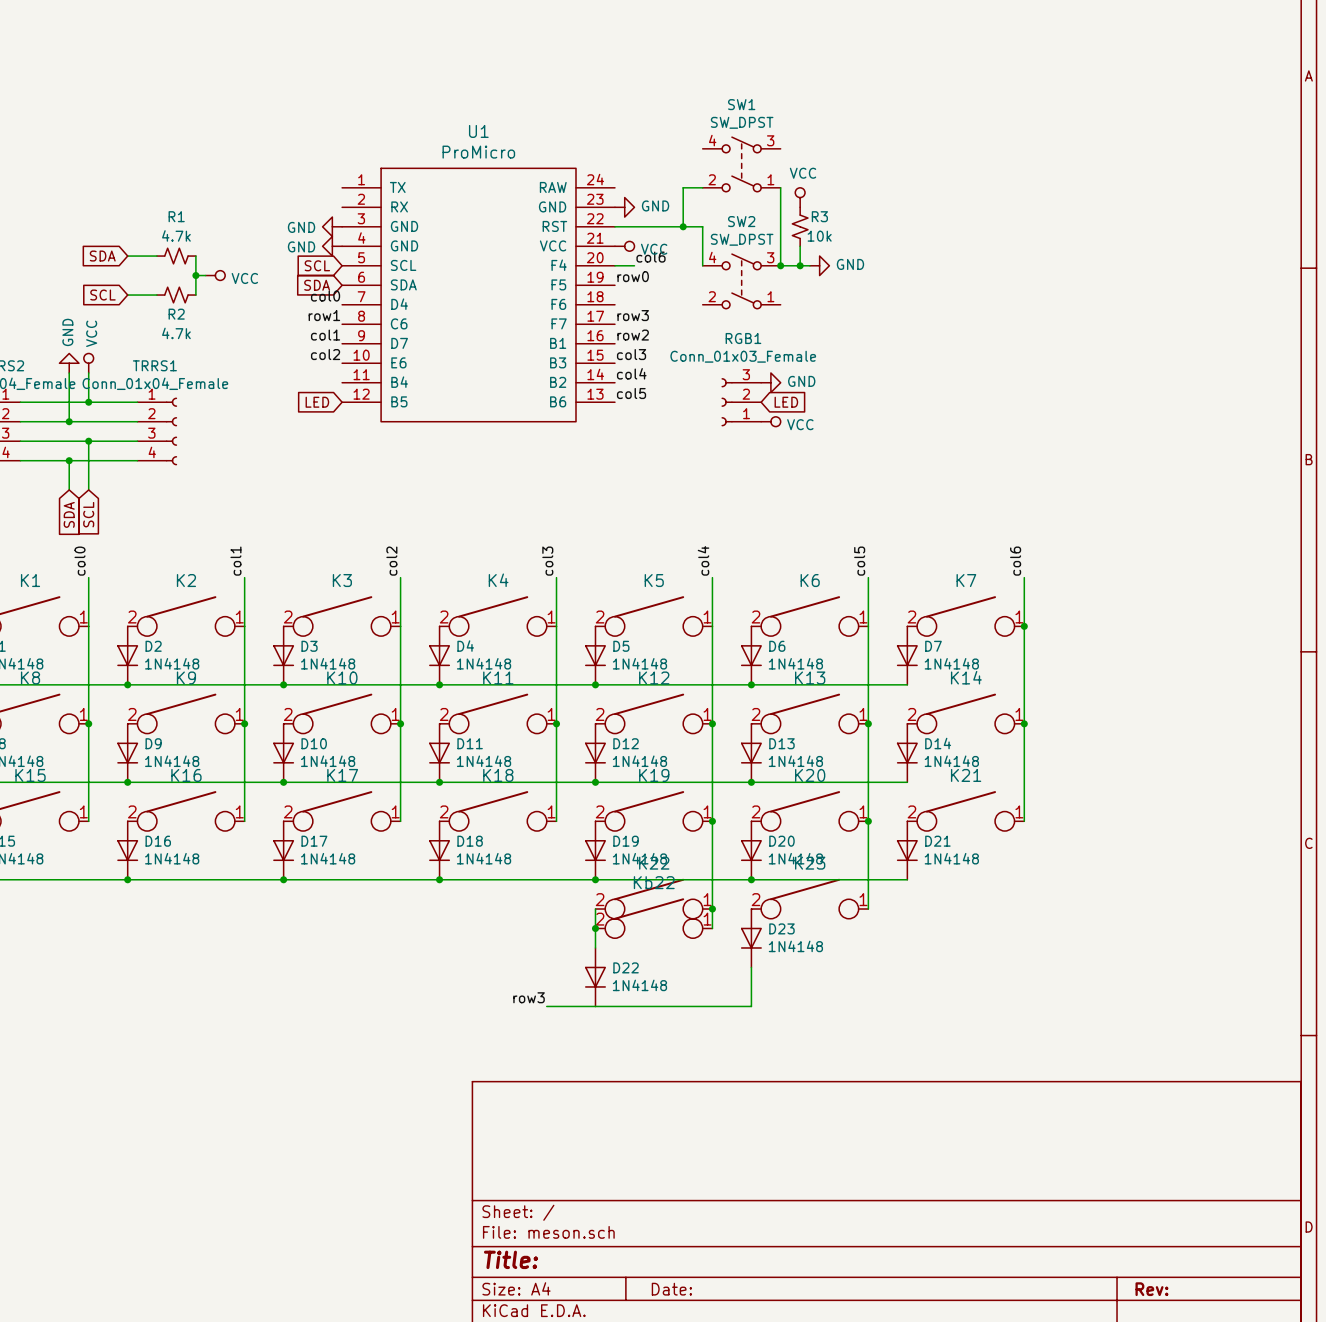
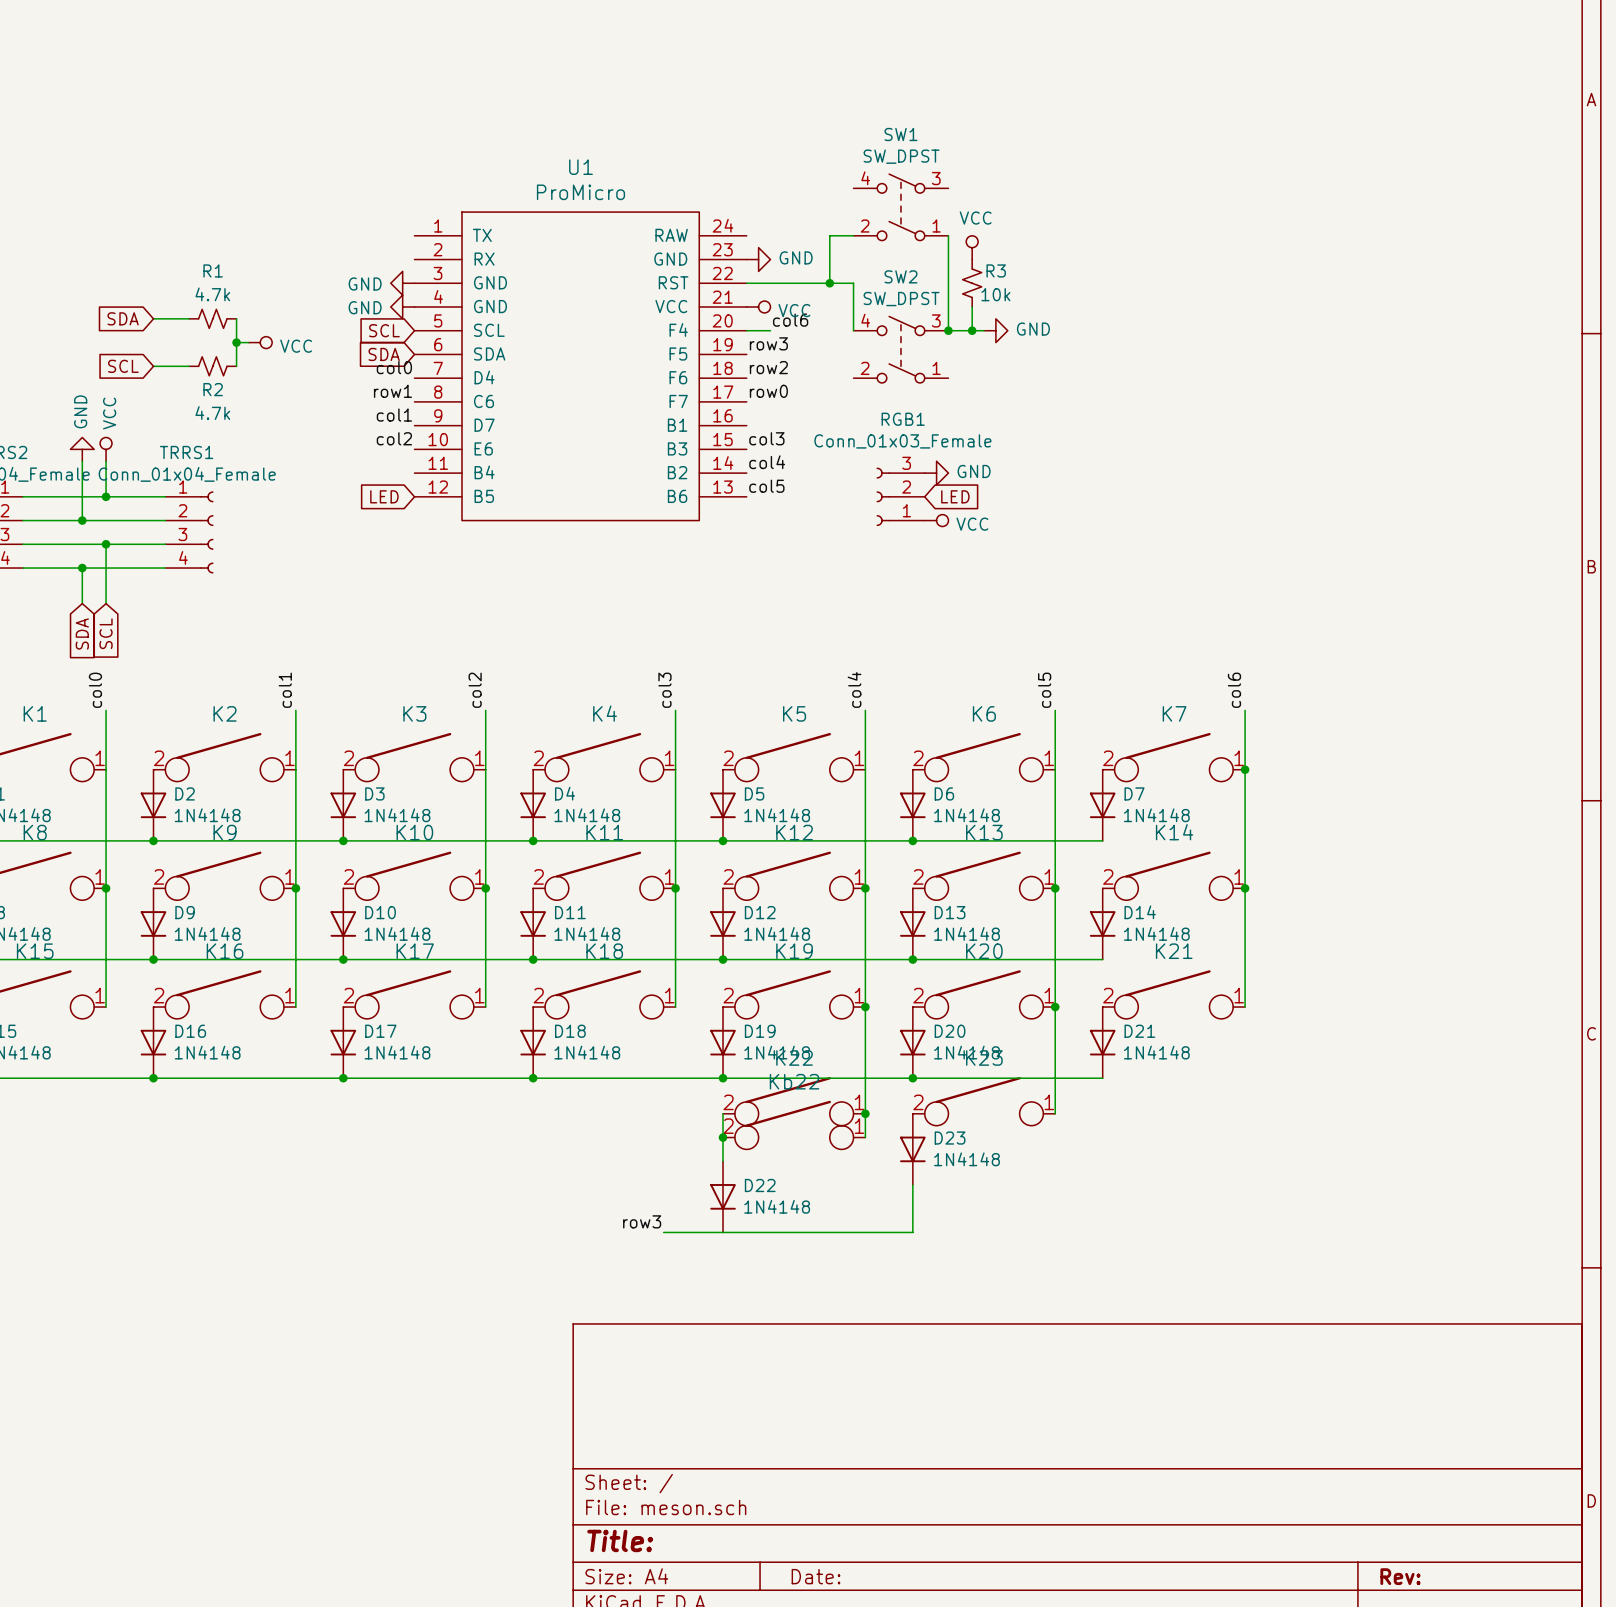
label: row0 (633, 276) -> row3 (768, 343)
label: row3 (633, 315) -> row0 (768, 391)
label position: row2 (633, 335) -> row2 (768, 367)

